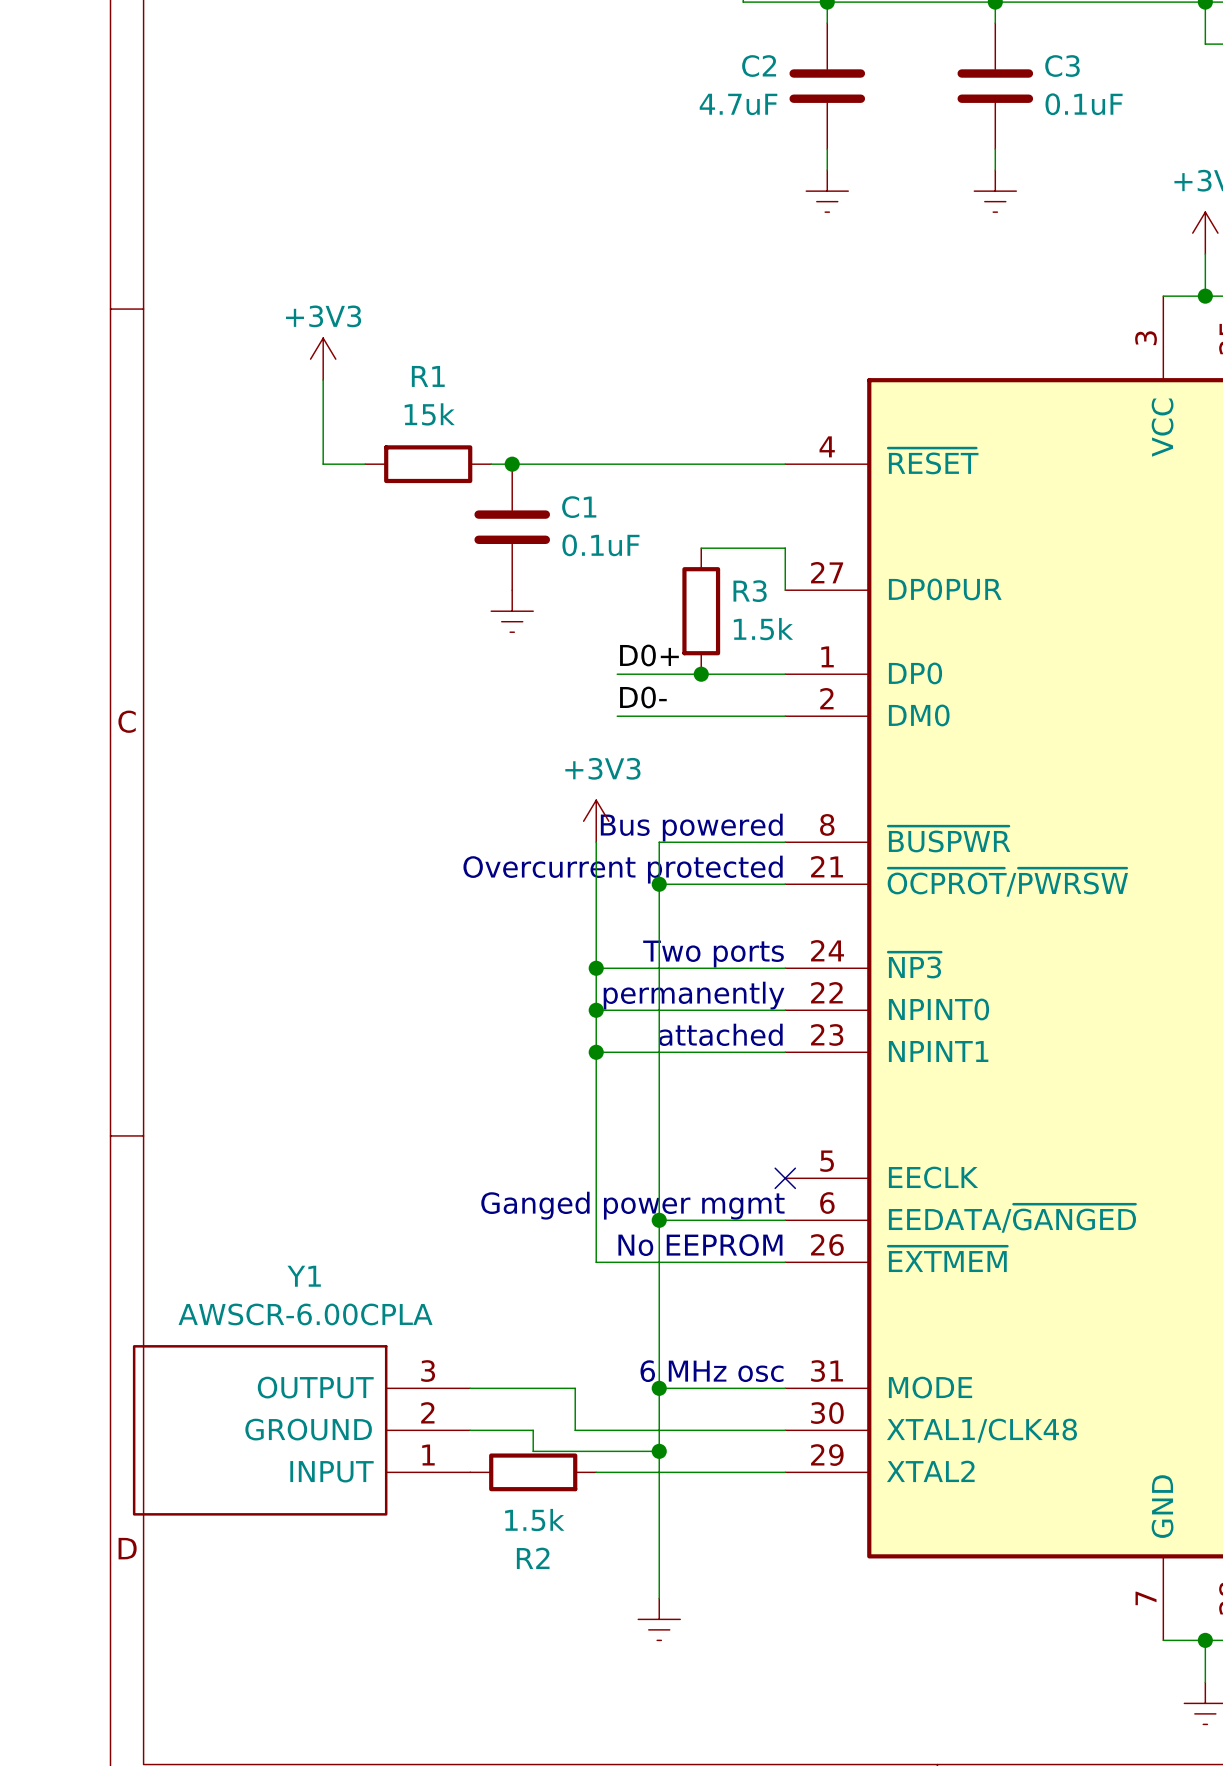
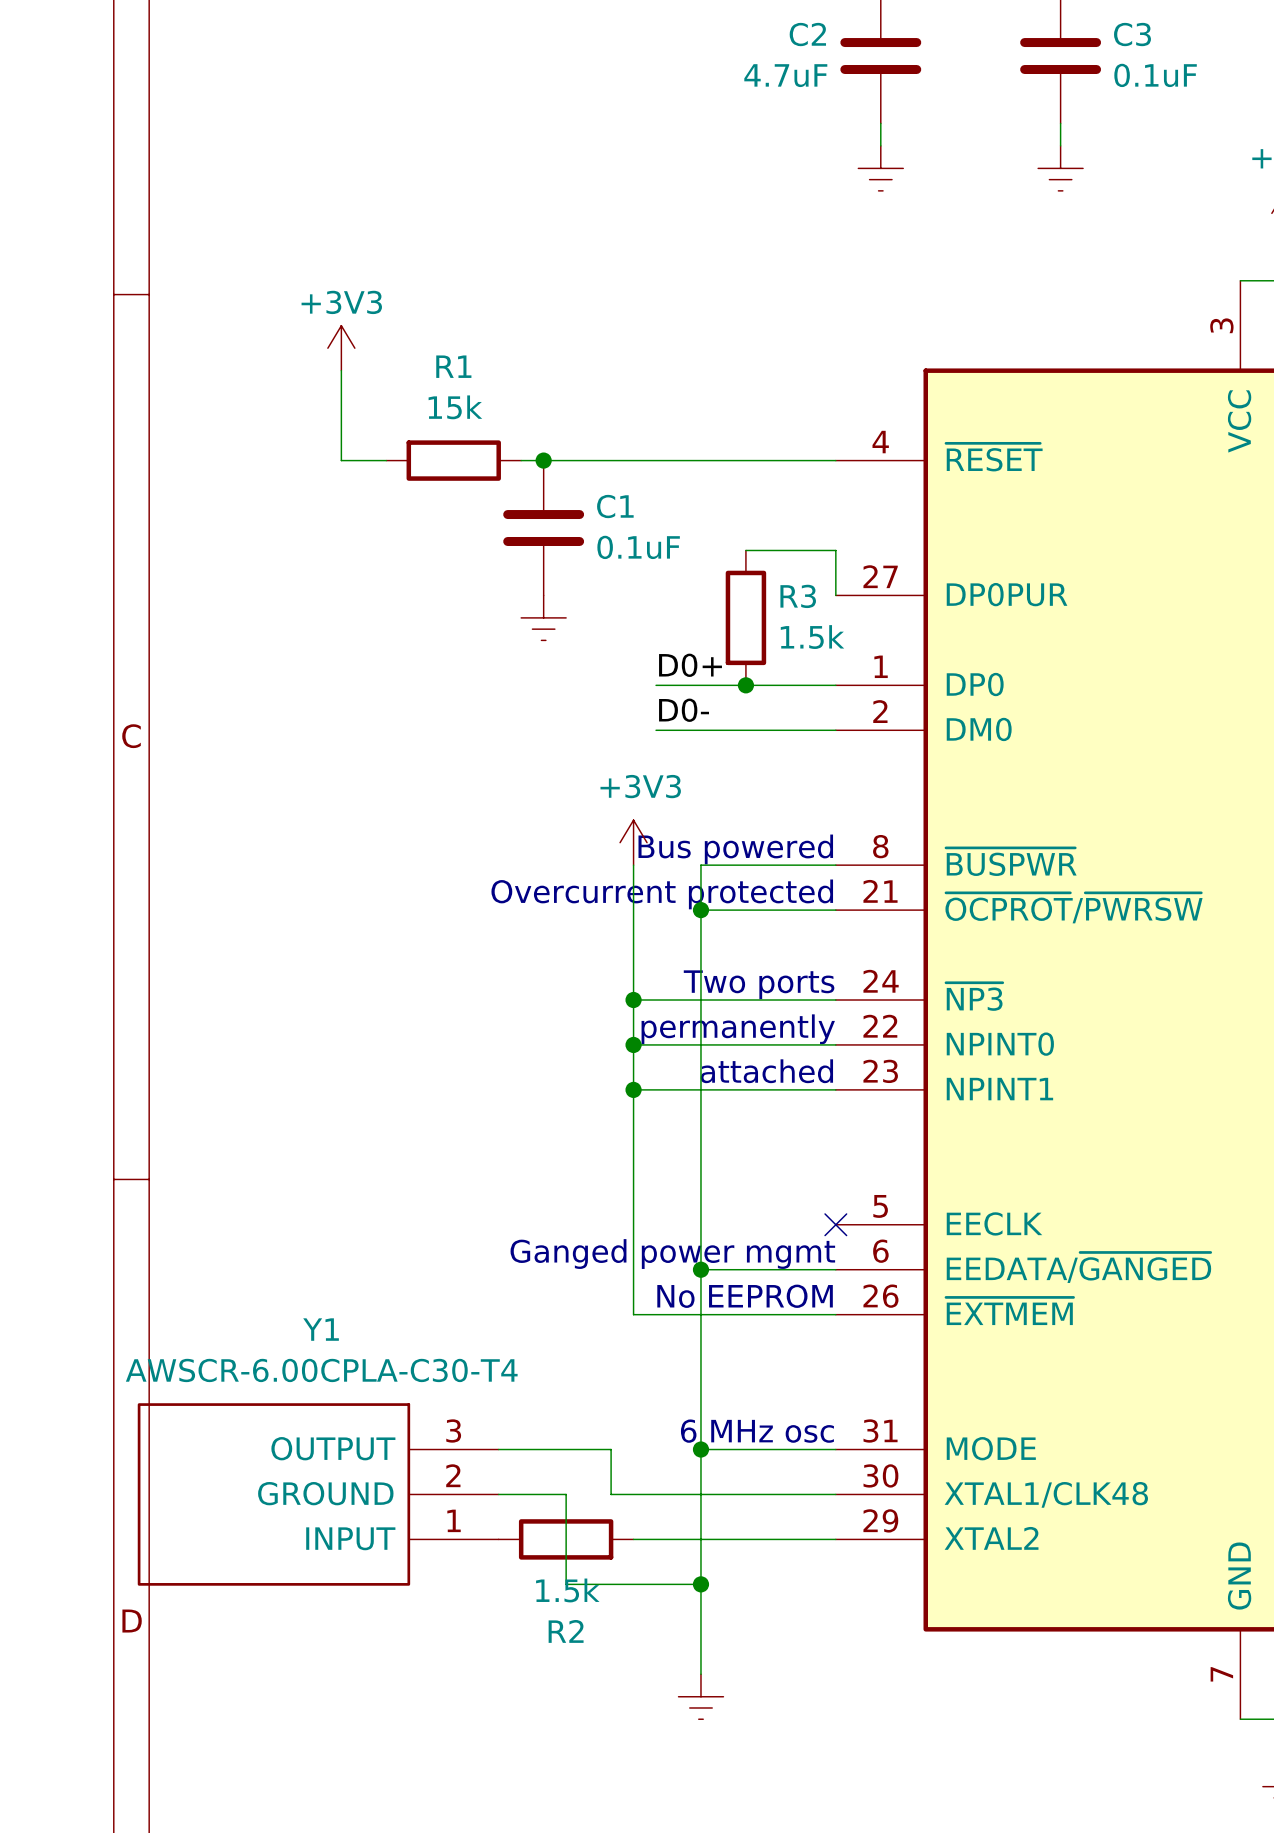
Y1 value: AWSCR-6.00CPLA (305, 1314) -> AWSCR-6.00CPLA-C30-T4 (321, 1370)
wire: (533, 1451) (659, 1451) -> (566, 1516) (566, 1584) (700, 1584)
junction position: (659, 1451) -> (700, 1584)

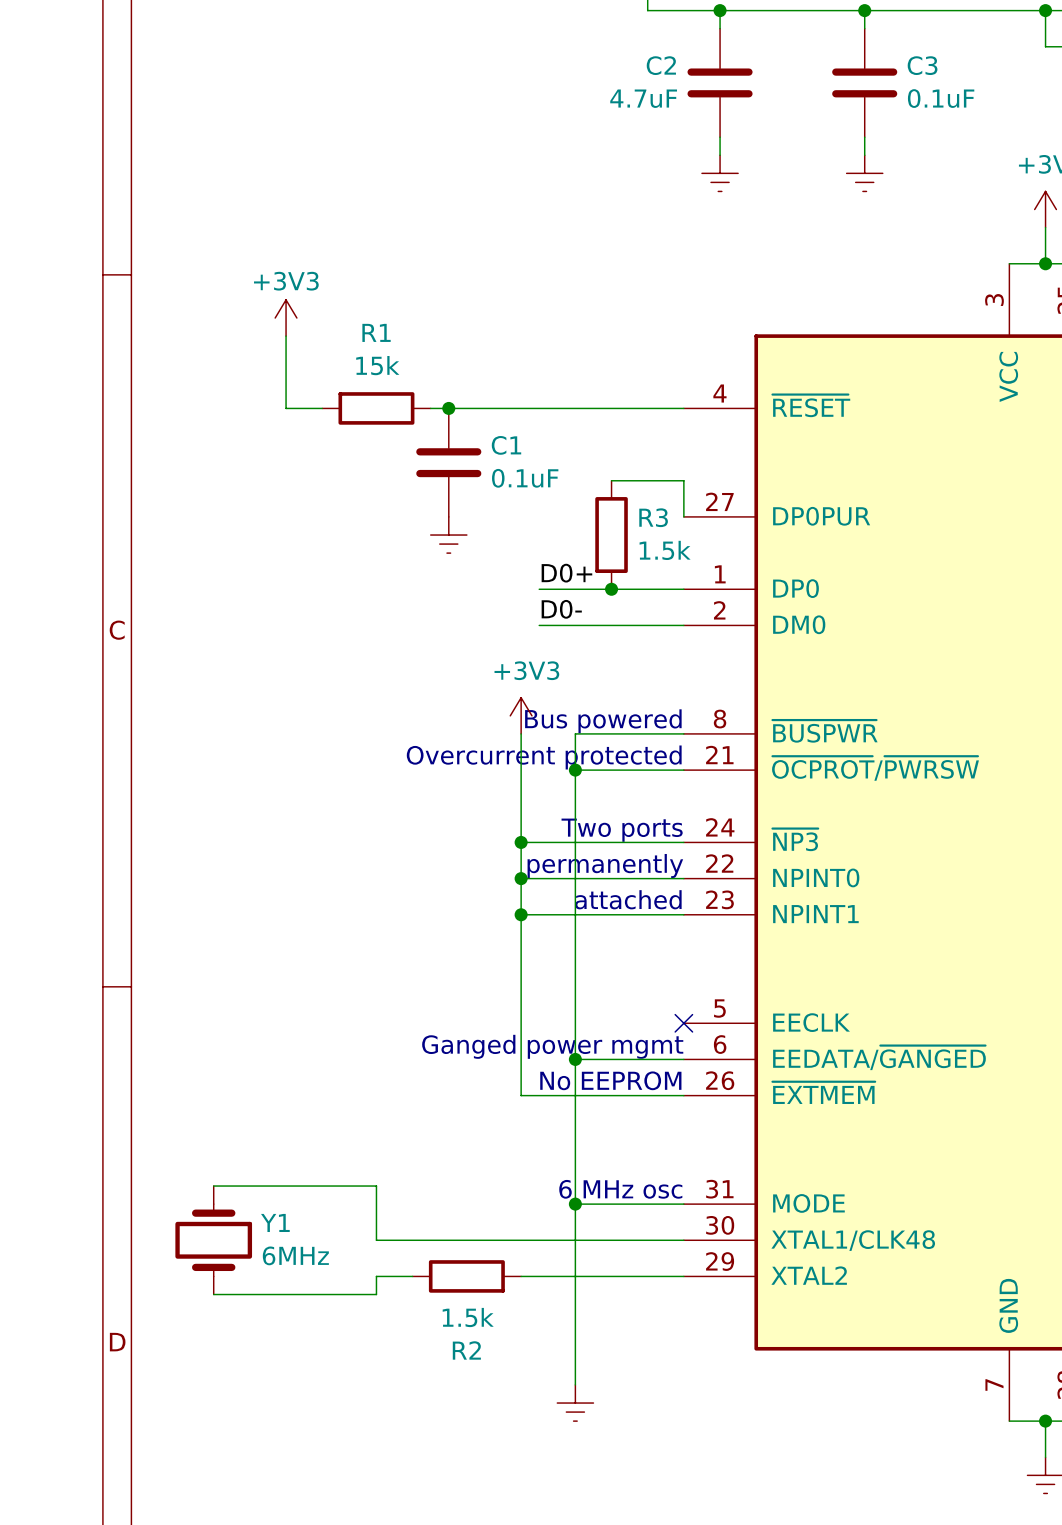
Y1 name position: Y1 (321, 1329) -> Y1 (275, 1222)
Y1 value: AWSCR-6.00CPLA-C30-T4 (321, 1370) -> 6MHz (295, 1255)
Y1 symbol: [137, 1403, 499, 1586] -> [175, 1186, 253, 1295]
wire: none -> (213, 1186) (376, 1186) (376, 1240) (412, 1240)
wire: (498, 1449) (611, 1449) (611, 1494) -> (466, 1240) (503, 1240)
wire: (566, 1494) (566, 1584) (700, 1584) -> none
wire: none -> (412, 1276) (376, 1276) (376, 1294) (213, 1294)
junction: (700, 1584) -> none

